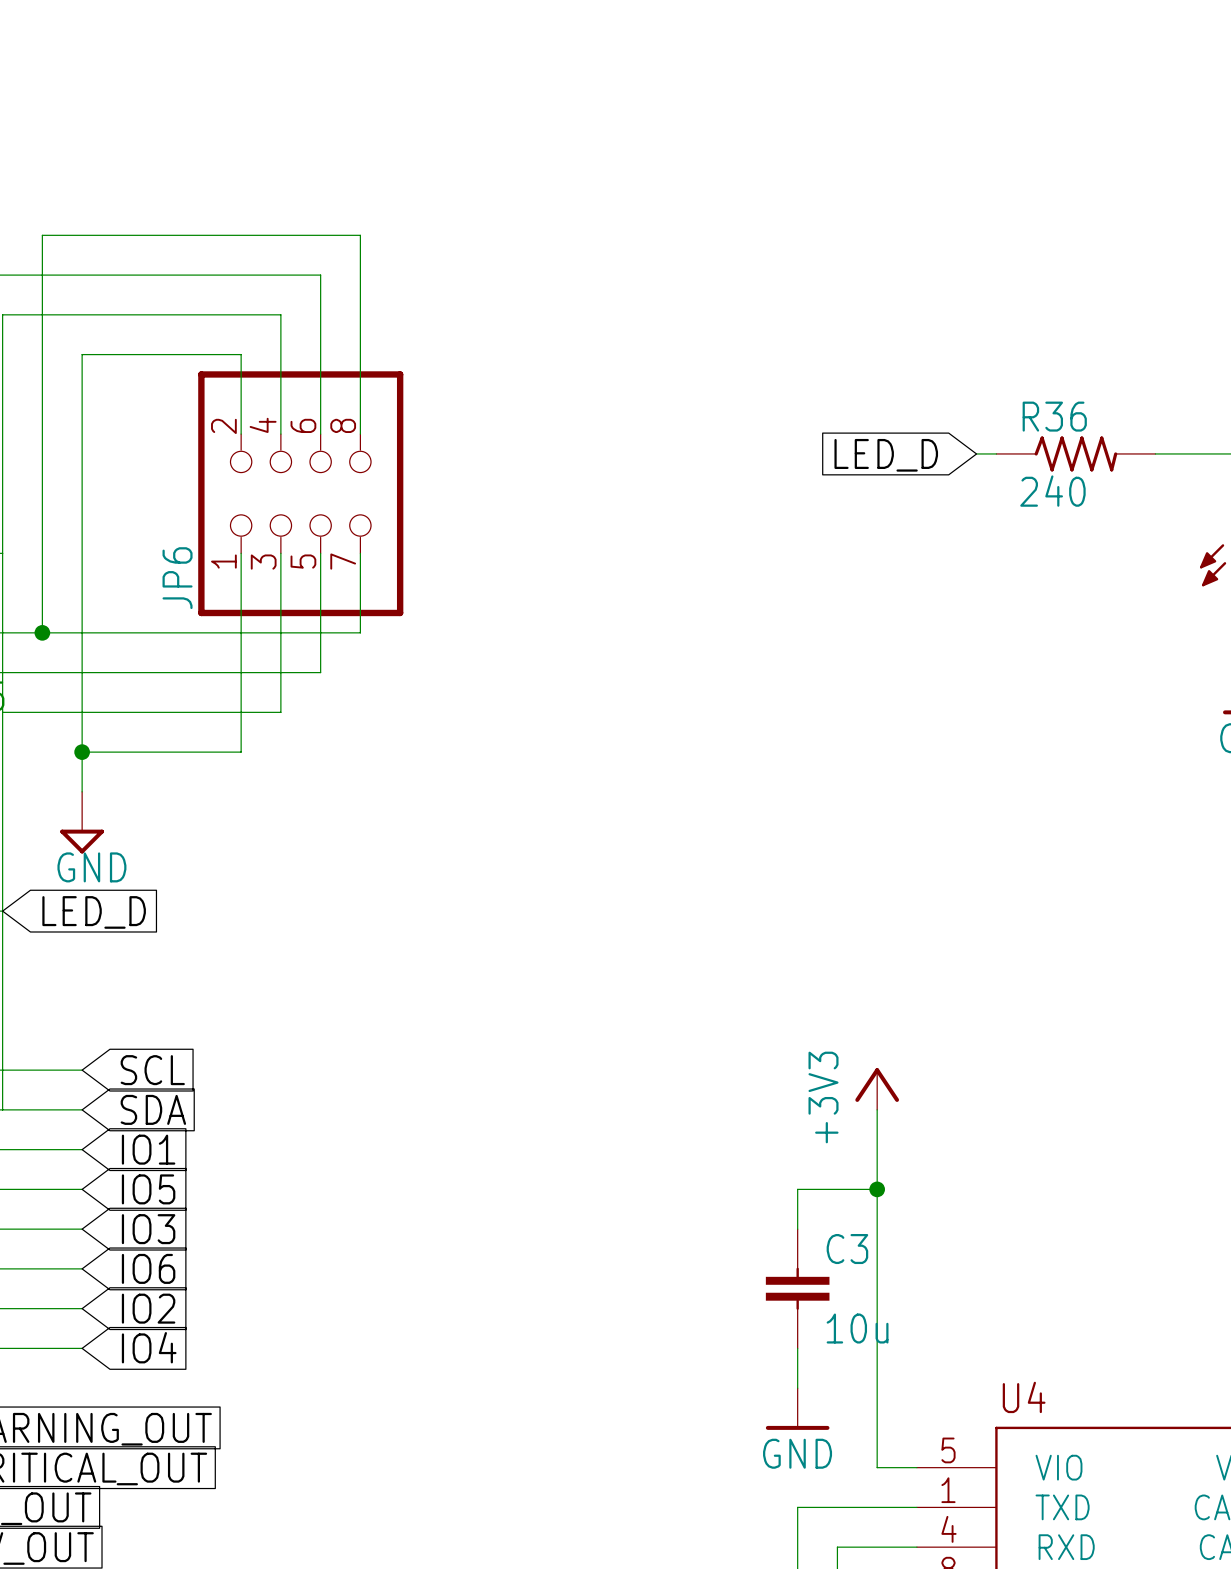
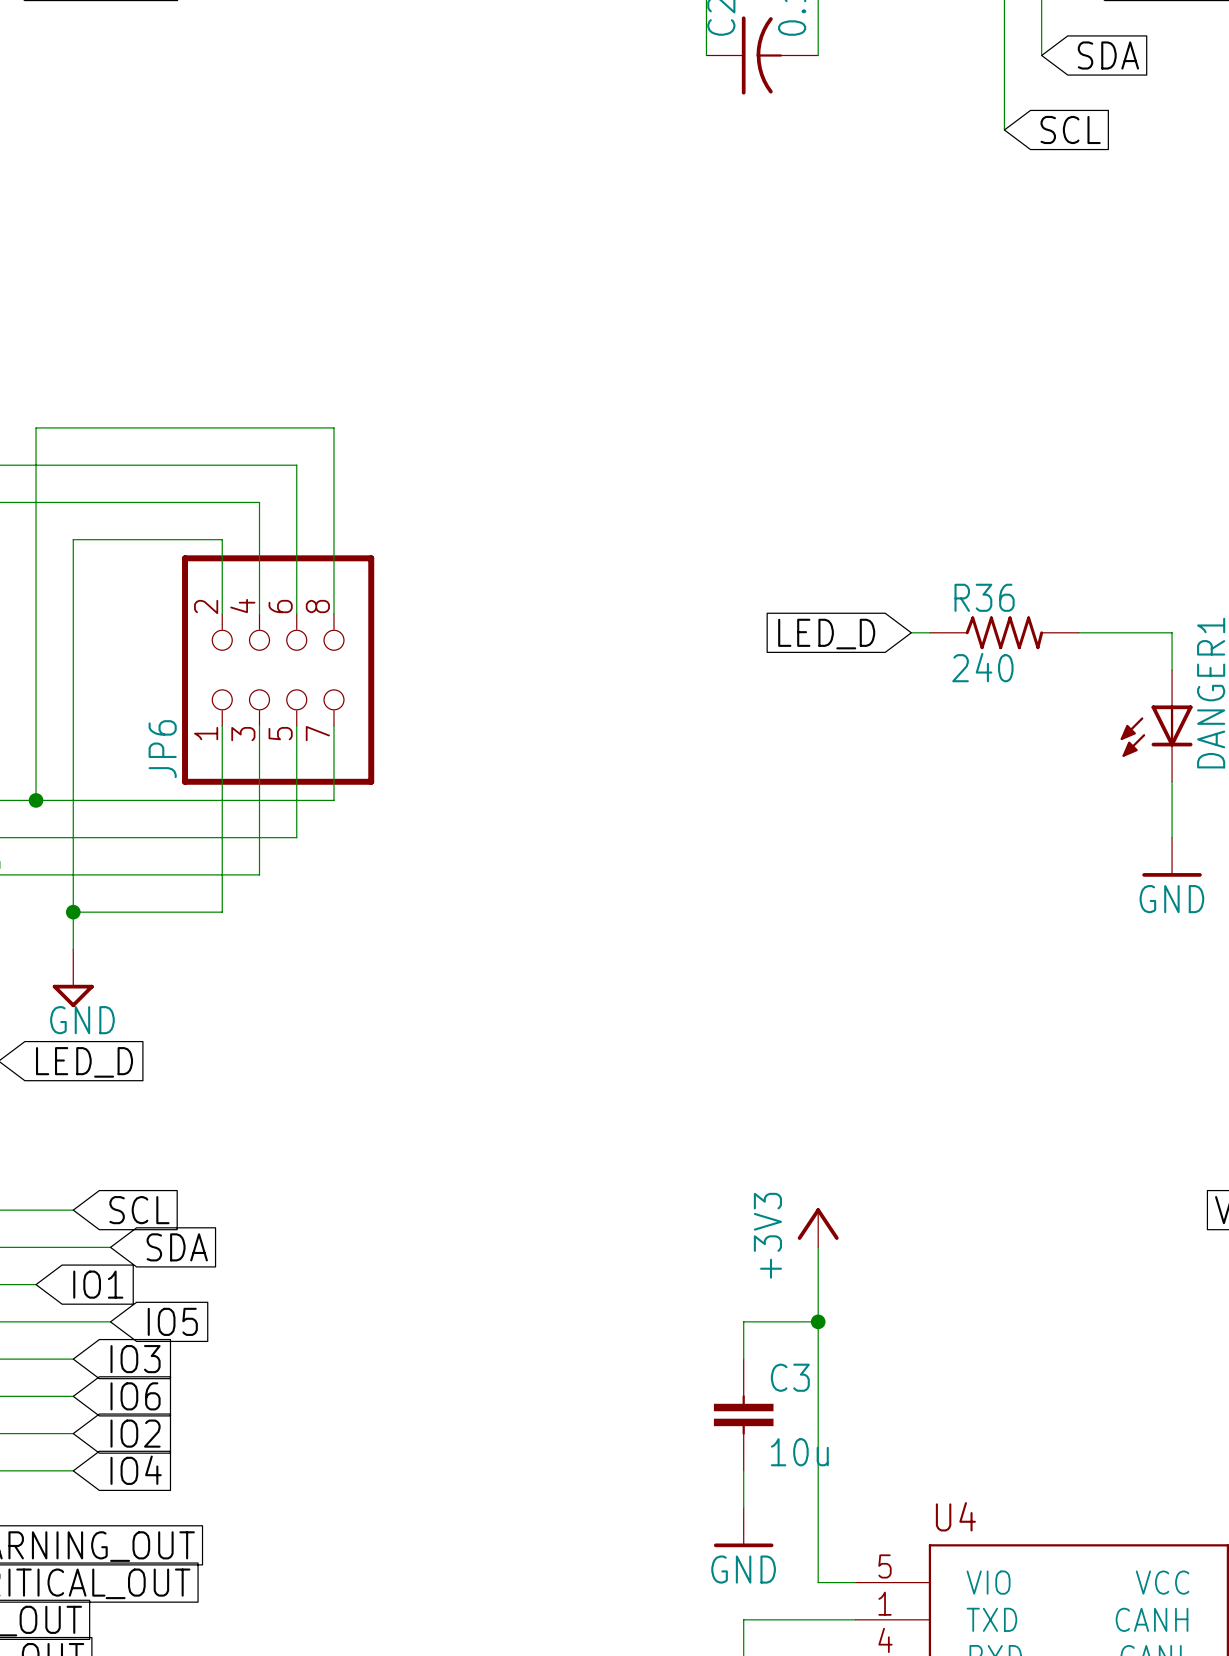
global label position: SDA (153, 1109) -> SDA (177, 1247)
wire: (42, 1149) (82, 1149) -> (73, 1247) (110, 1247)
global label position: IO1 (148, 1149) -> IO1 (98, 1284)
wire: none -> (73, 1321) (110, 1321)
global label position: IO5 (148, 1189) -> IO5 (172, 1321)

